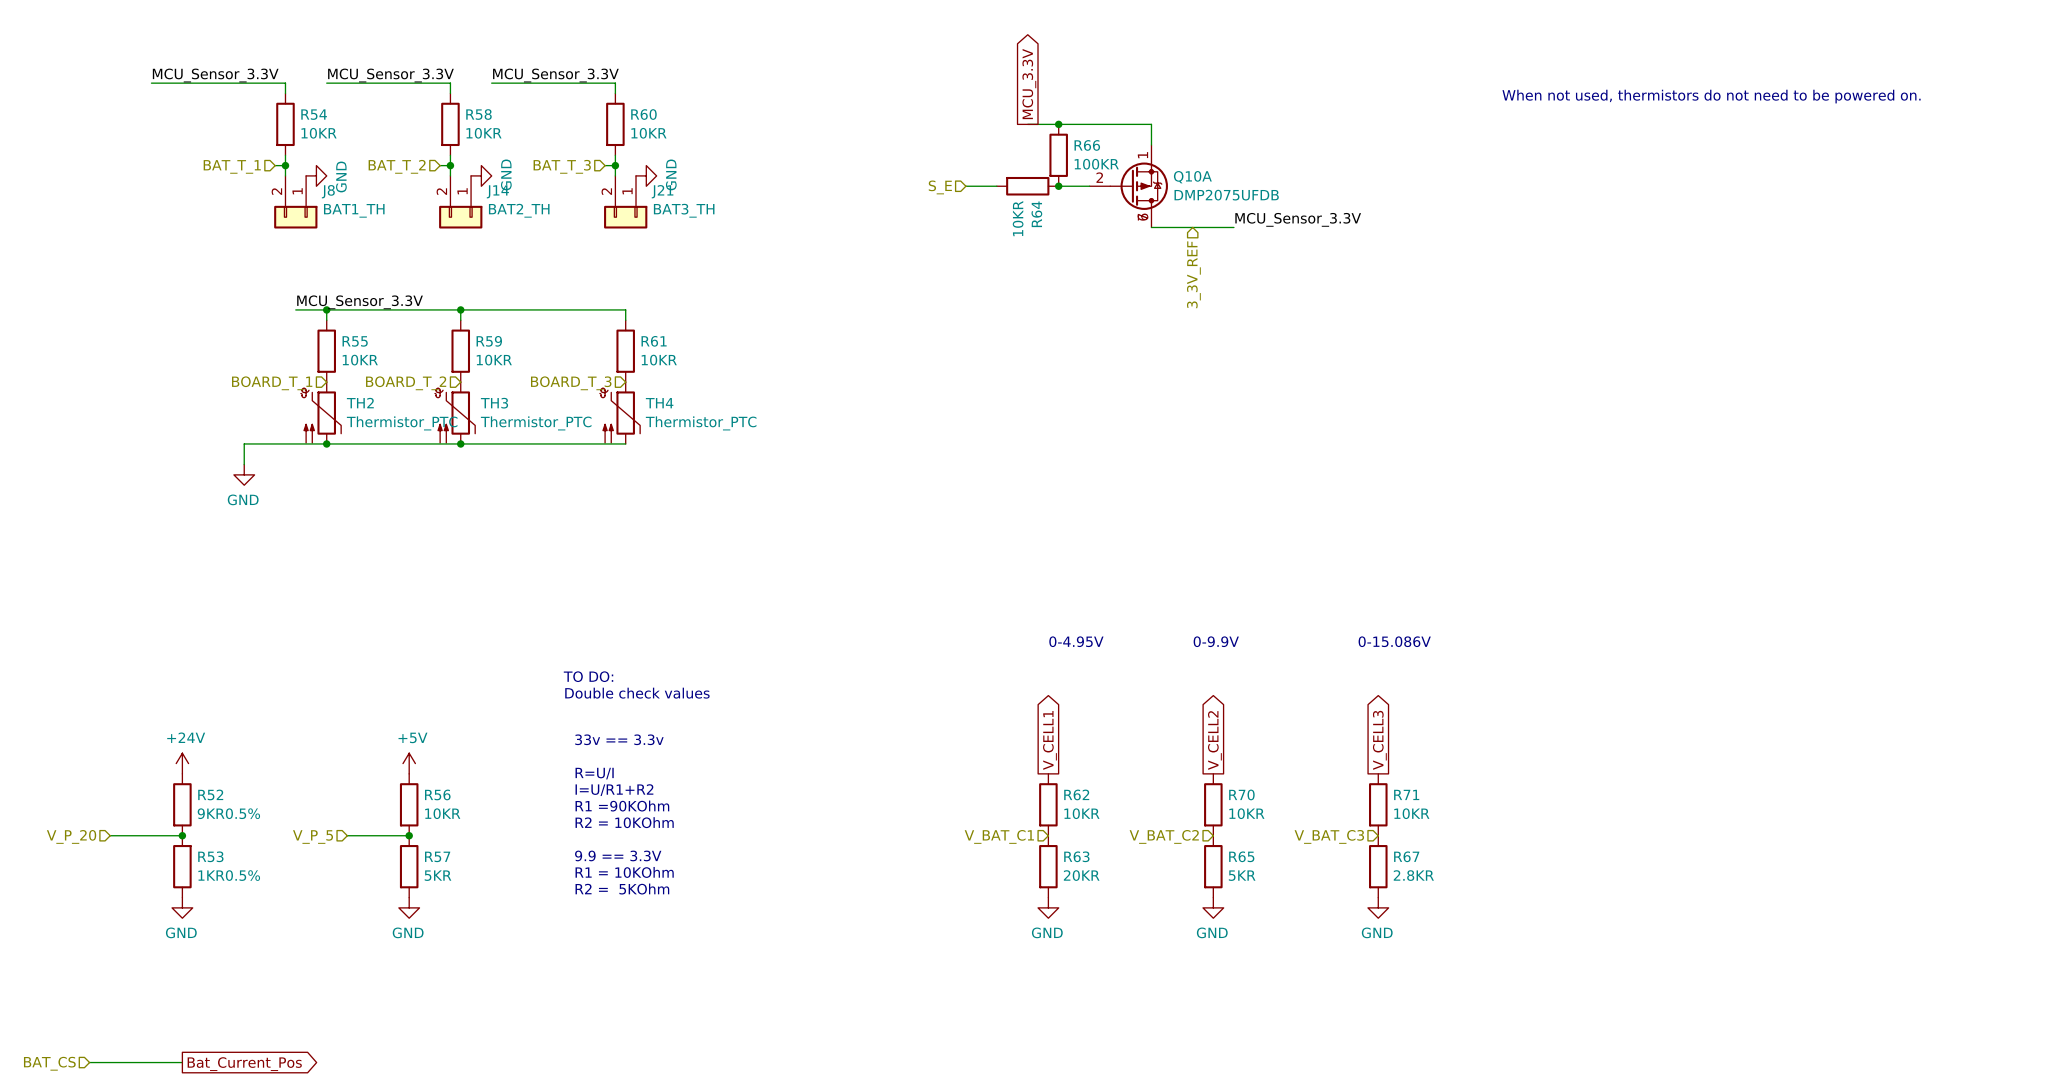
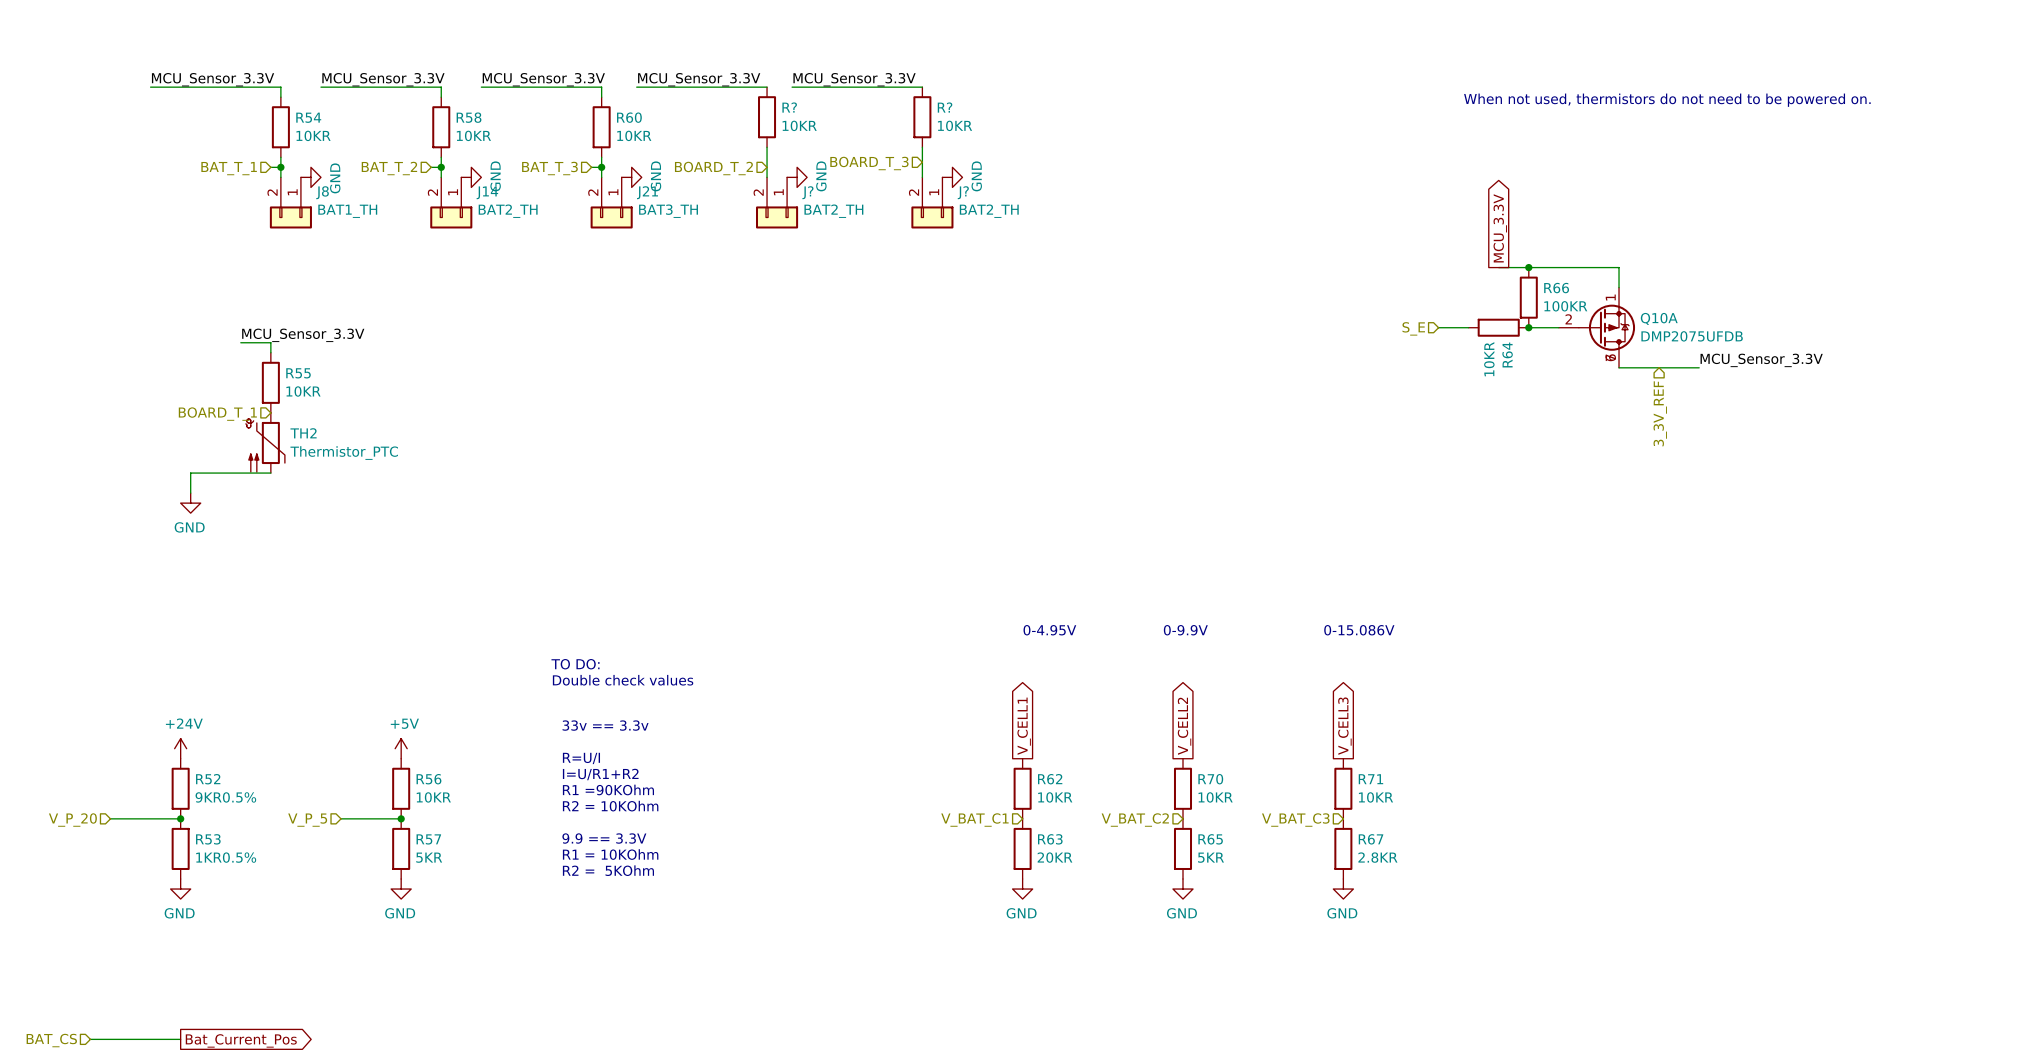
label: none -> MCU_Sensor_3.3V (699, 79)
label: none -> MCU_Sensor_3.3V (854, 79)
wire: none -> (636, 87) (767, 87)
wire: none -> (792, 87) (922, 87)
global label: MCU_3.3V (1029, 84) -> none
R?: none -> 10KR (767, 117)
R?: none -> 10KR (922, 117)
wire: (1027, 124) (1151, 124) (1151, 145) -> none
junction: (1058, 124) -> none
wire: none -> (767, 147) (767, 177)
wire: none -> (922, 147) (922, 177)
R66 position: (1058, 155) -> (1528, 297)
hierarchical label: none -> BOARD_T_3 (869, 163)
hierarchical label: none -> BOARD_T_2 (713, 168)
power symbol: none -> GND (797, 177)
power symbol: none -> GND (952, 177)
wire: (965, 186) (996, 186) -> none
R64 position: (1027, 186) -> (1498, 327)
wire: (1058, 186) (1089, 186) -> none
junction: (1058, 186) -> none
Q10A position: (1128, 186) -> (1596, 327)
hierarchical label: S_E (940, 187) -> none
J?: none -> BAT2_TH (777, 202)
J?: none -> BAT2_TH (932, 202)
label: MCU_Sensor_3.3V (1298, 219) -> none
wire: (1151, 227) (1233, 227) -> none
global label: none -> MCU_3.3V (1500, 228)
wire: none -> (1498, 267) (1619, 267) (1619, 287)
junction: none -> (1528, 267)
hierarchical label: 3_3V_REF (1193, 274) -> none
label position: MCU_Sensor_3.3V (360, 302) -> MCU_Sensor_3.3V (303, 335)
wire: (295, 309) (625, 309) (625, 320) -> none
wire: (326, 309) (326, 320) -> none
junction: (326, 309) -> none
wire: (460, 309) (460, 320) -> none
junction: (460, 309) -> none
wire: none -> (1438, 327) (1468, 327)
wire: none -> (1528, 327) (1558, 327)
junction: none -> (1528, 327)
hierarchical label: none -> S_E (1413, 328)
wire: none -> (240, 342) (270, 342) (270, 352)
R55 position: (326, 351) -> (270, 382)
R59: 10KR (460, 351) -> none
R61: 10KR (625, 351) -> none
label: none -> MCU_Sensor_3.3V (1761, 360)
wire: none -> (1619, 367) (1699, 367)
hierarchical label position: BOARD_T_1 (272, 383) -> BOARD_T_1 (217, 414)
hierarchical label: BOARD_T_2 (406, 383) -> none
hierarchical label: BOARD_T_3 (571, 383) -> none
TH2 position: (321, 413) -> (265, 442)
TH3: Thermistor_PTC (455, 413) -> none
TH4: Thermistor_PTC (620, 413) -> none
hierarchical label: none -> 3_3V_REF (1660, 413)
junction: (326, 443) -> none
junction: (460, 443) -> none
wire: (625, 443) (244, 443) (244, 464) -> none
power symbol position: GND (244, 474) -> GND (190, 503)
wire: none -> (270, 473) (190, 473) (190, 493)

